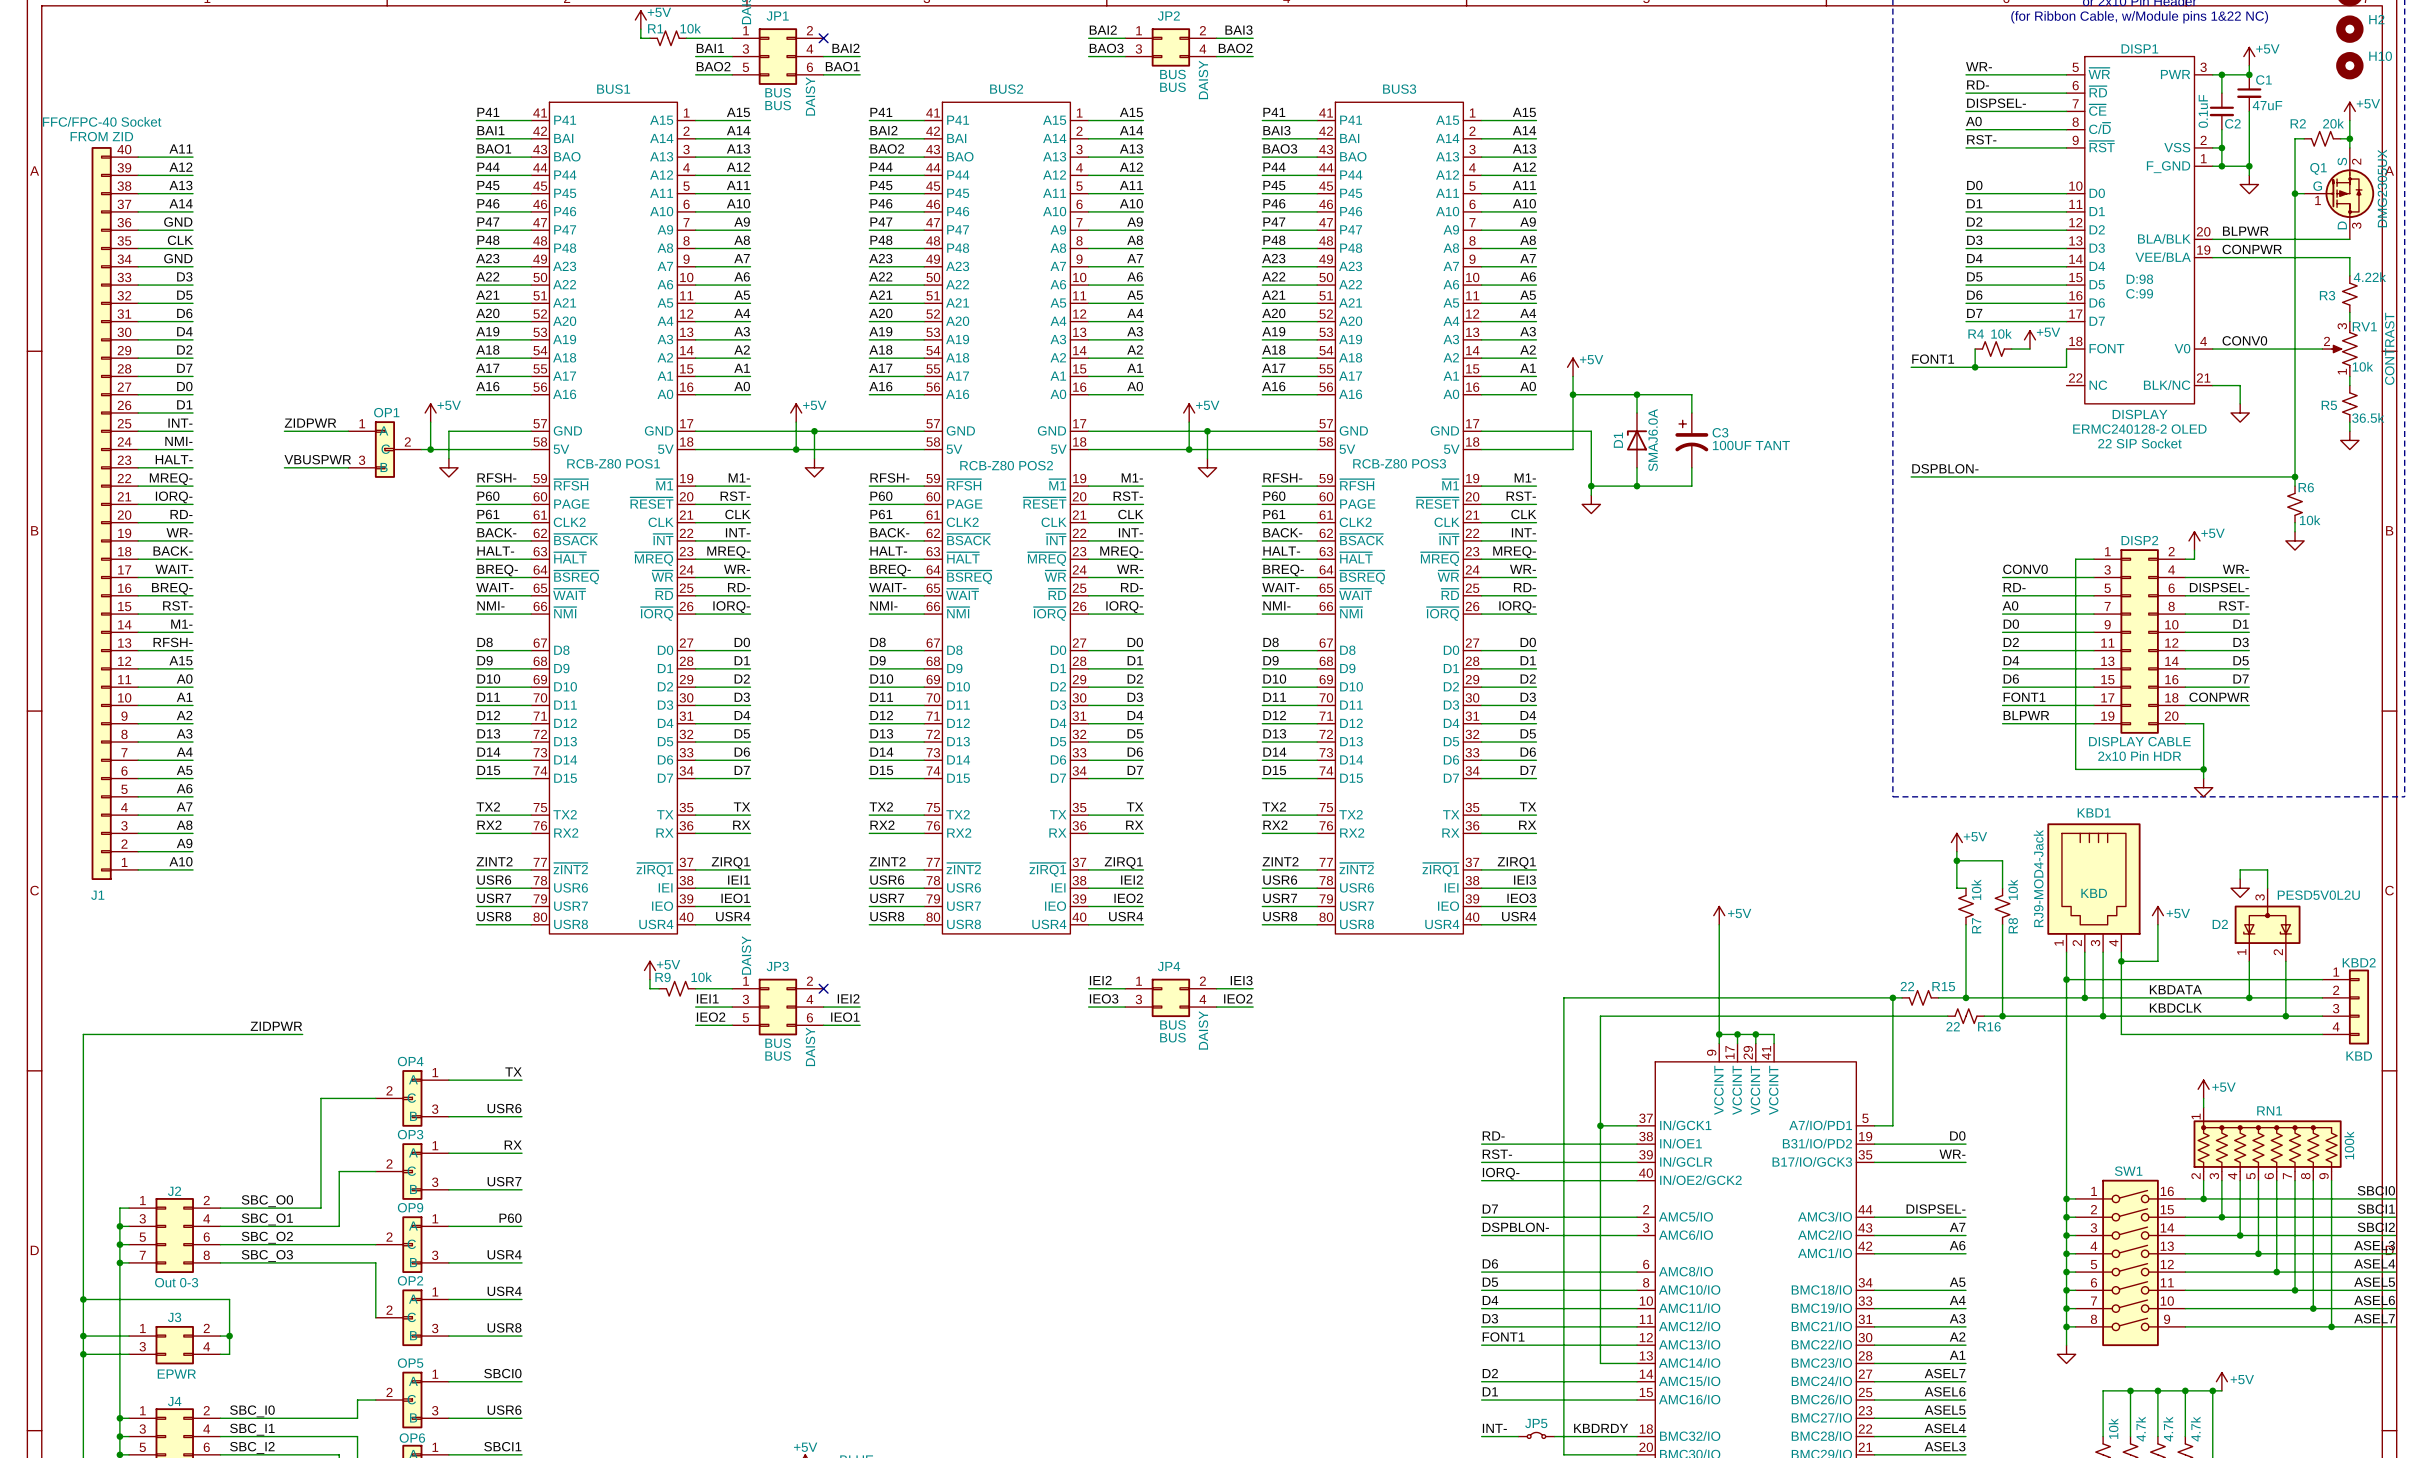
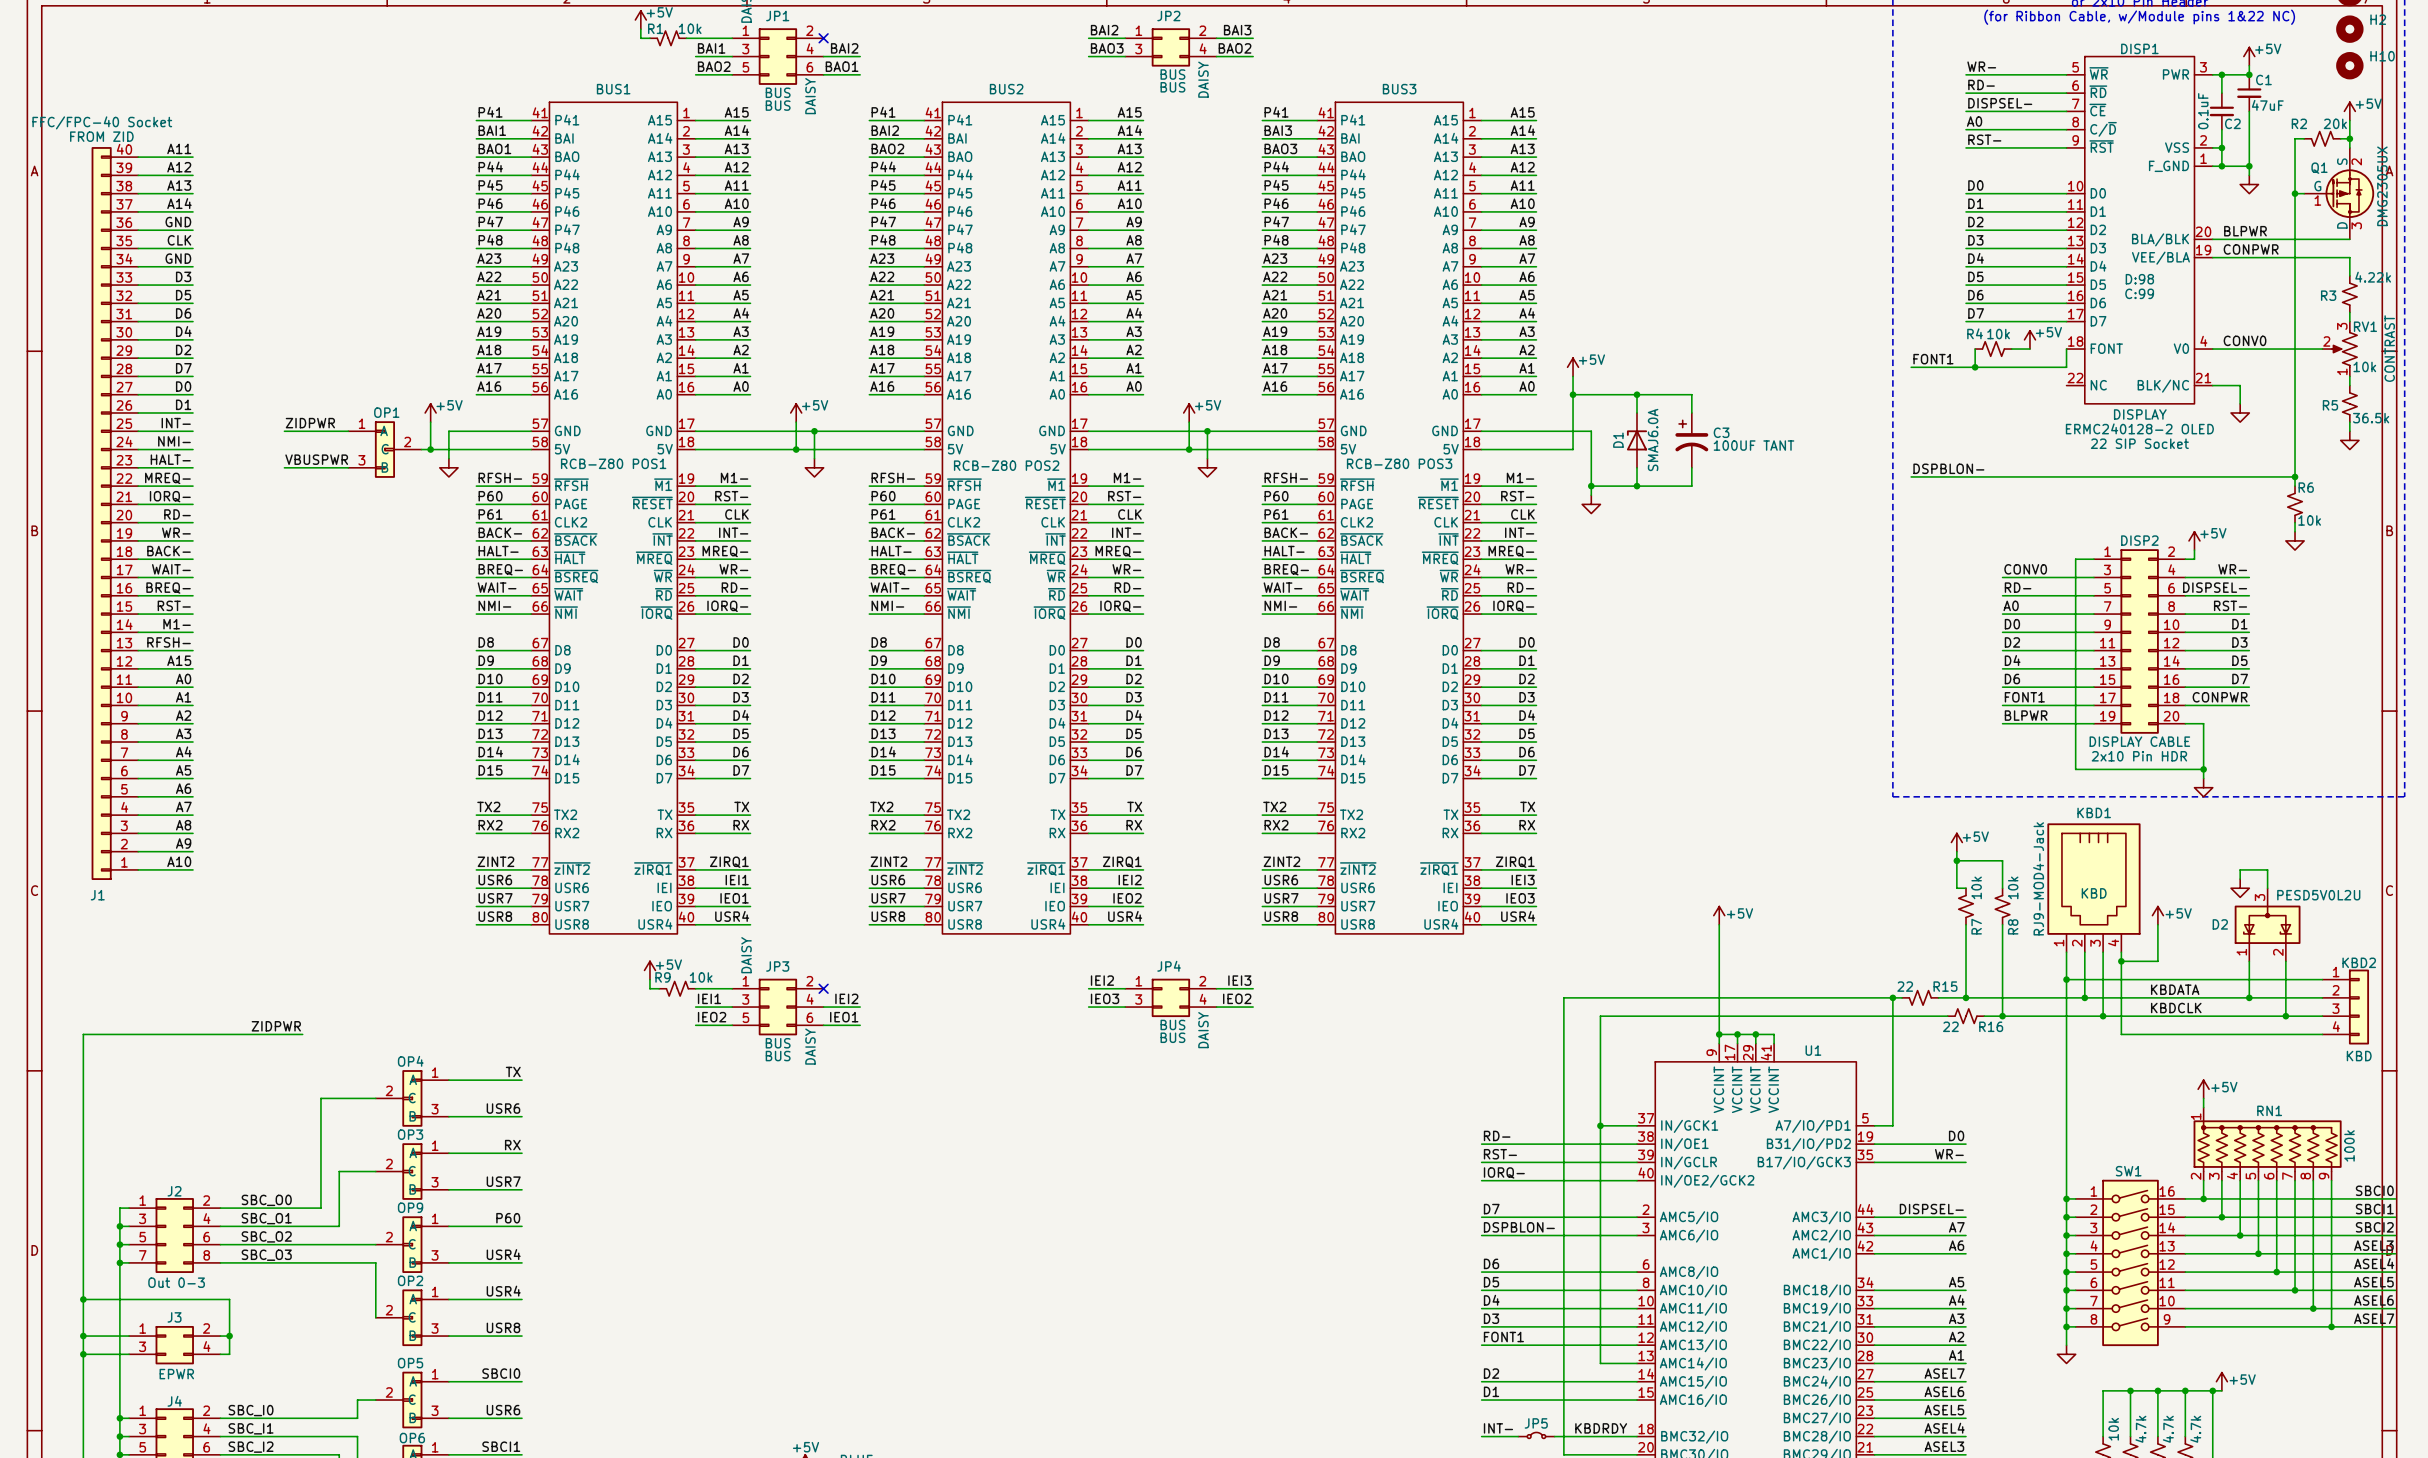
U1 name: none -> U1 (1813, 1050)

